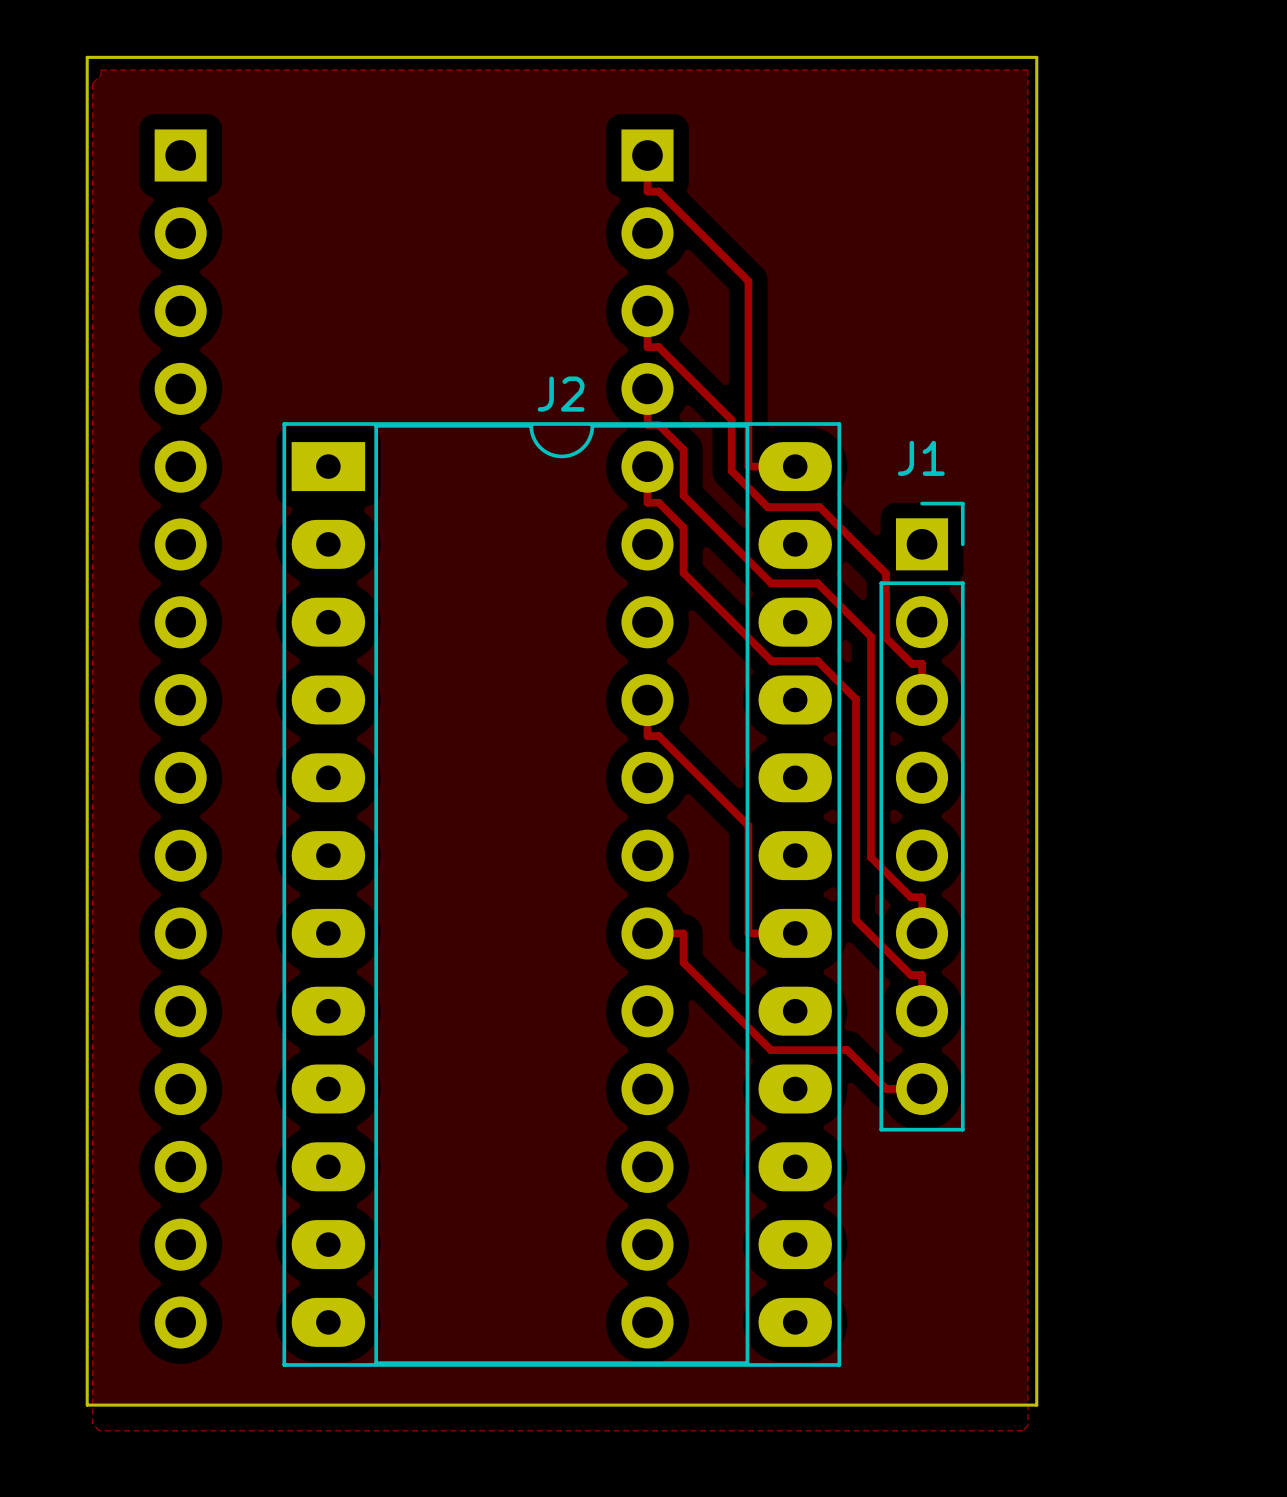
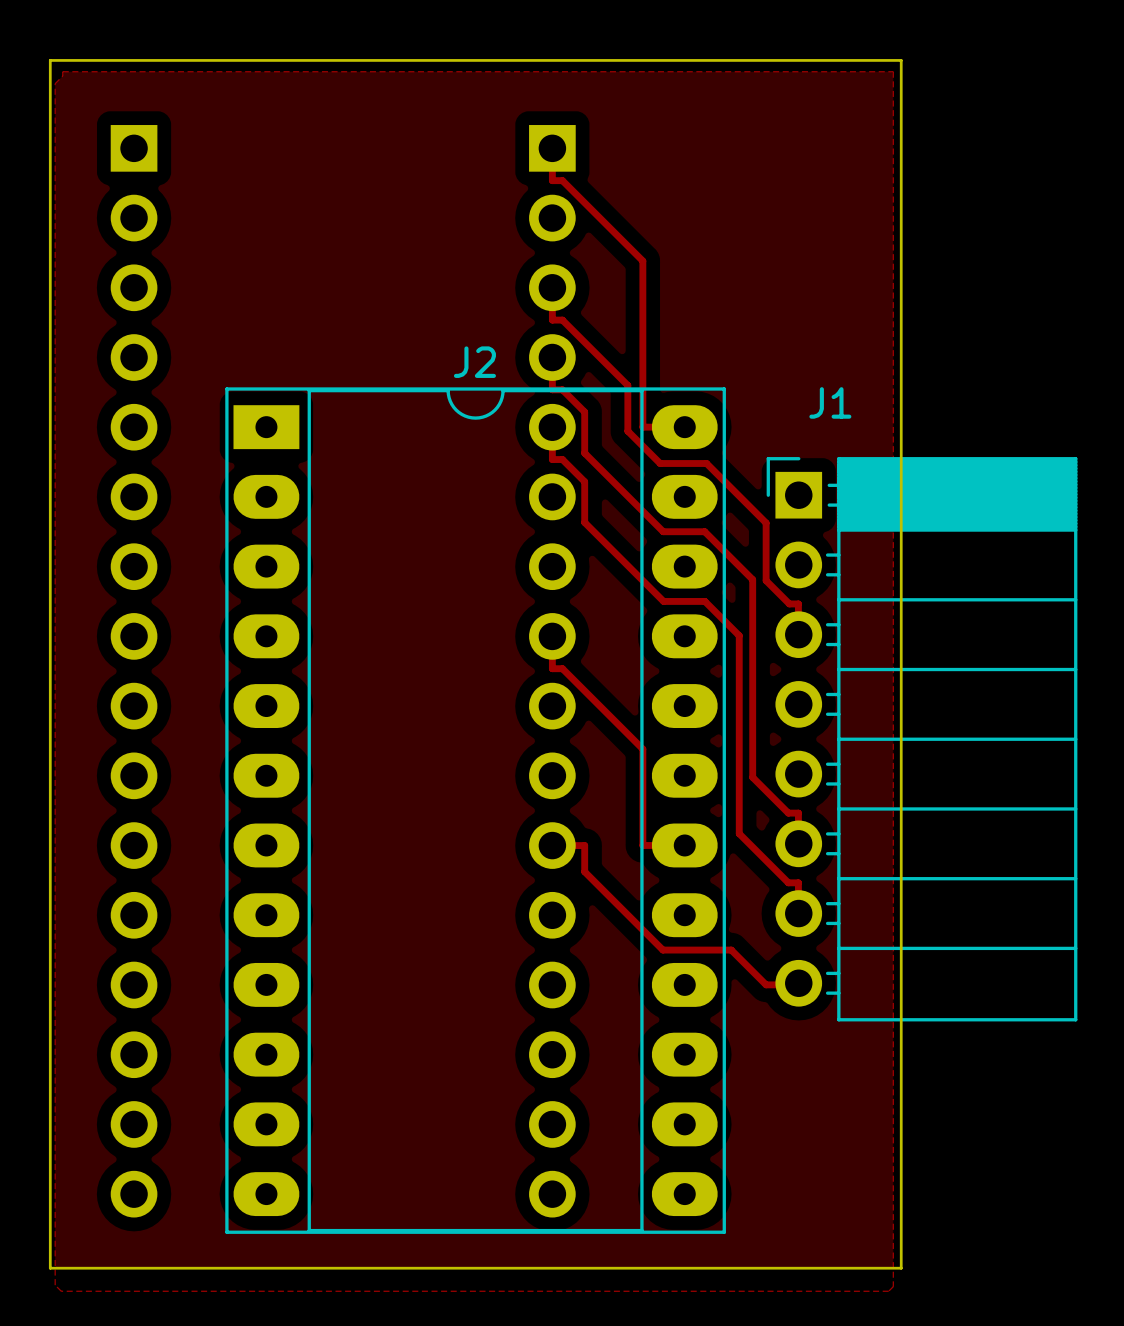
J1 name position: J1 (921, 458) -> J1 (830, 402)
J1 footprint: [879, 501, 965, 1132] -> [766, 457, 1078, 1022]

